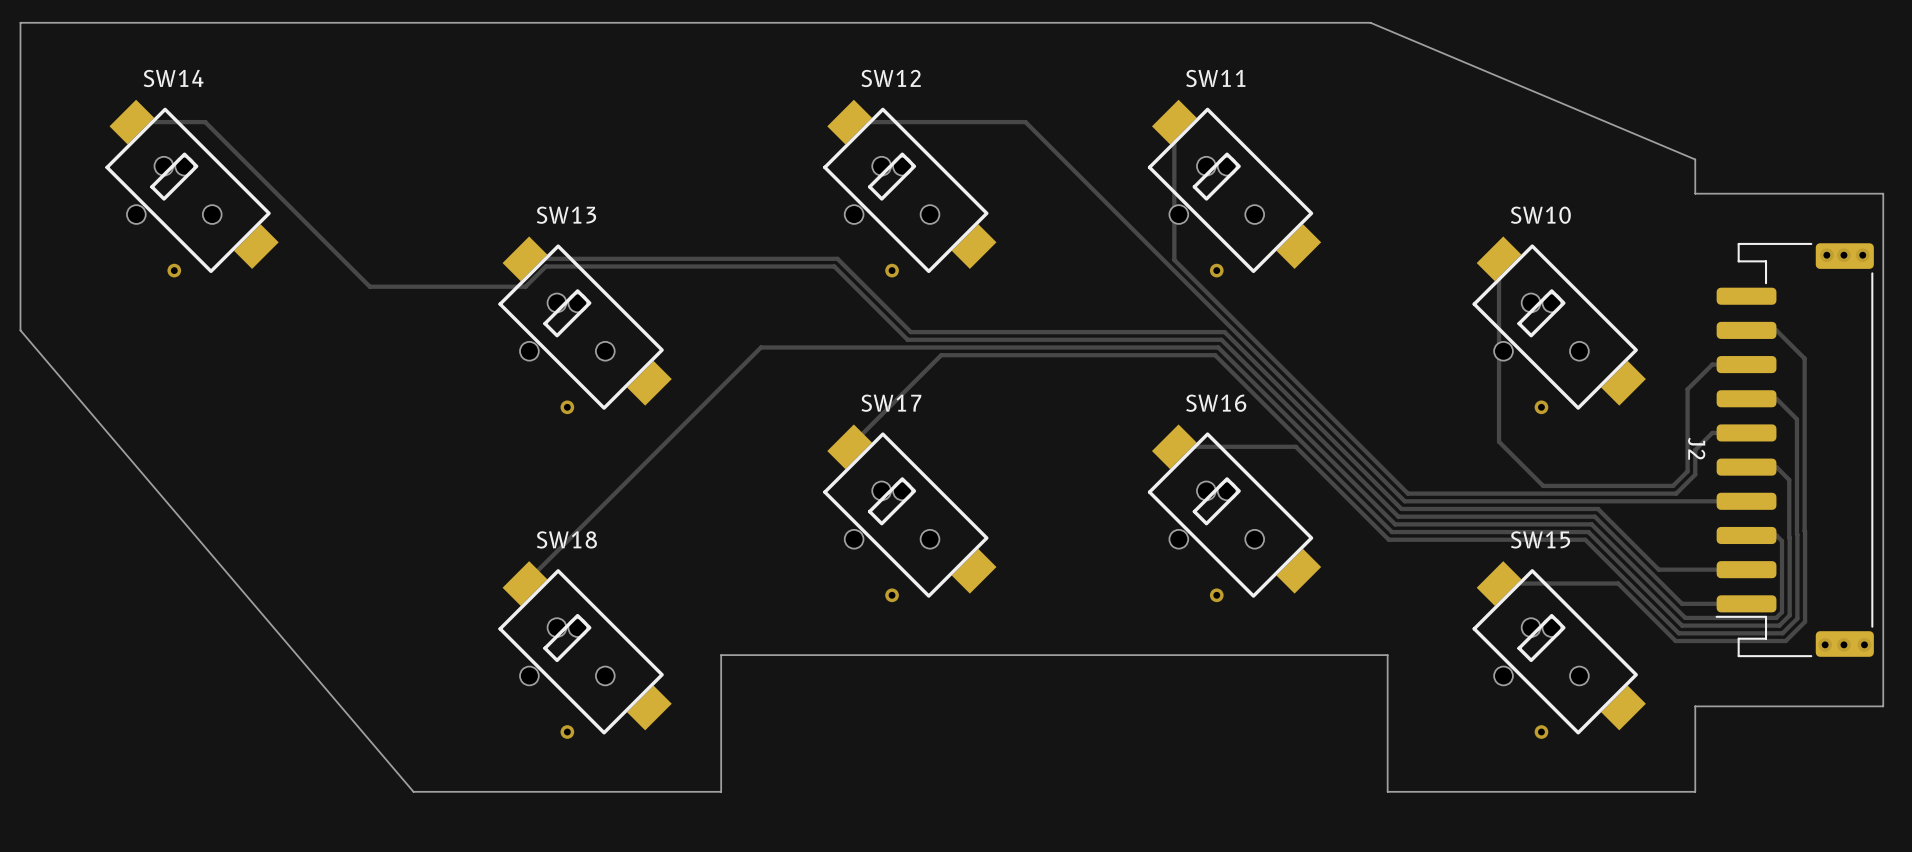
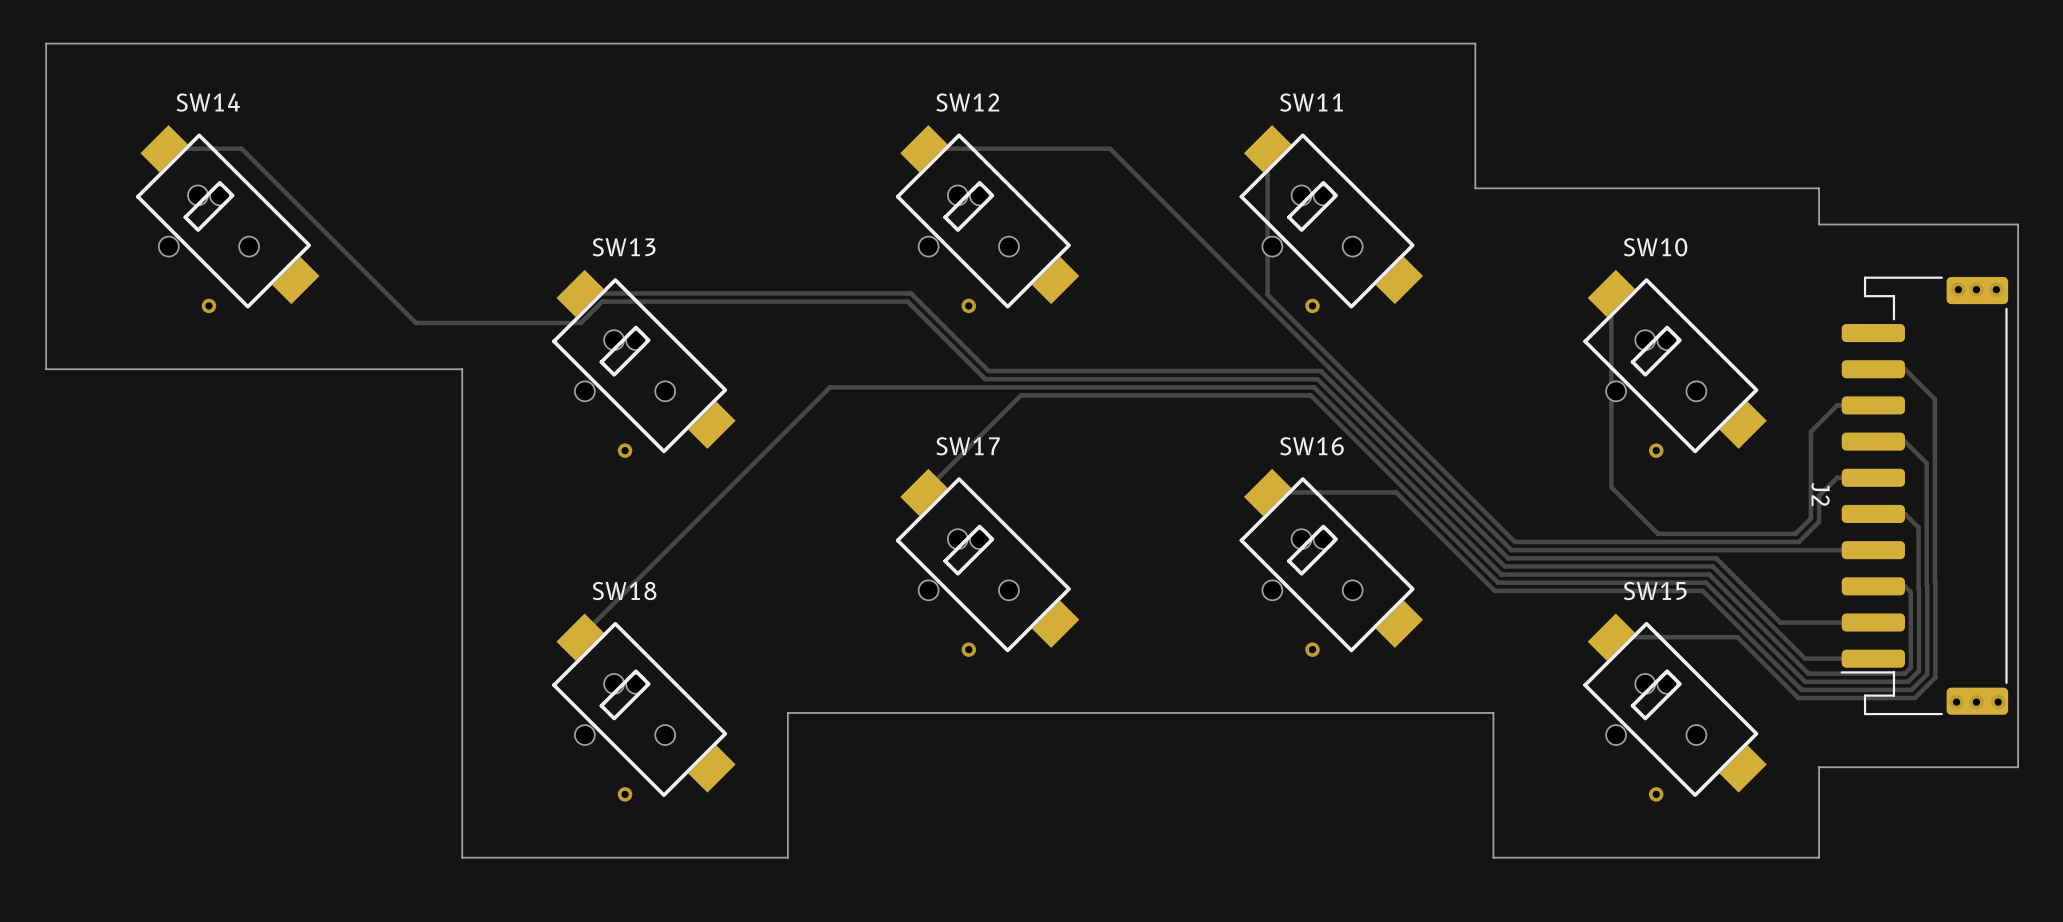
board edge: (1370, 22) (1695, 159) -> (1475, 43) (1475, 188) (1819, 188)
board edge: (20, 330) (413, 791) -> (46, 369) (462, 369) (462, 857)

